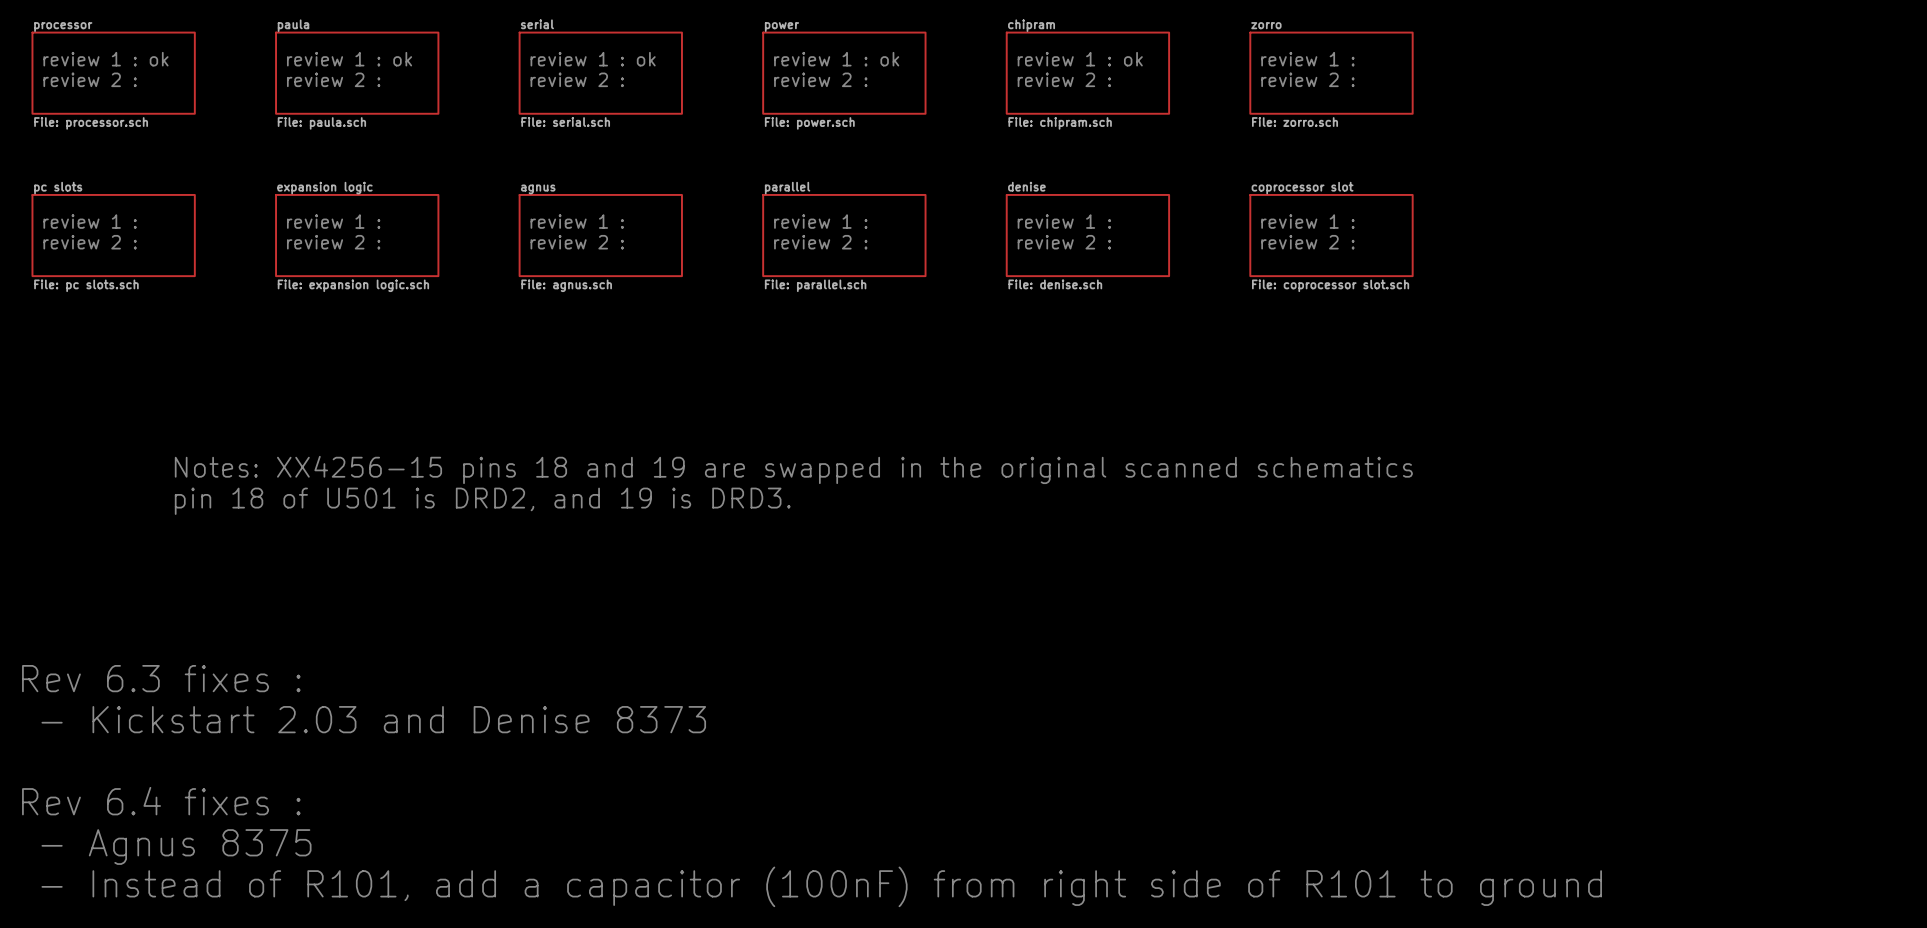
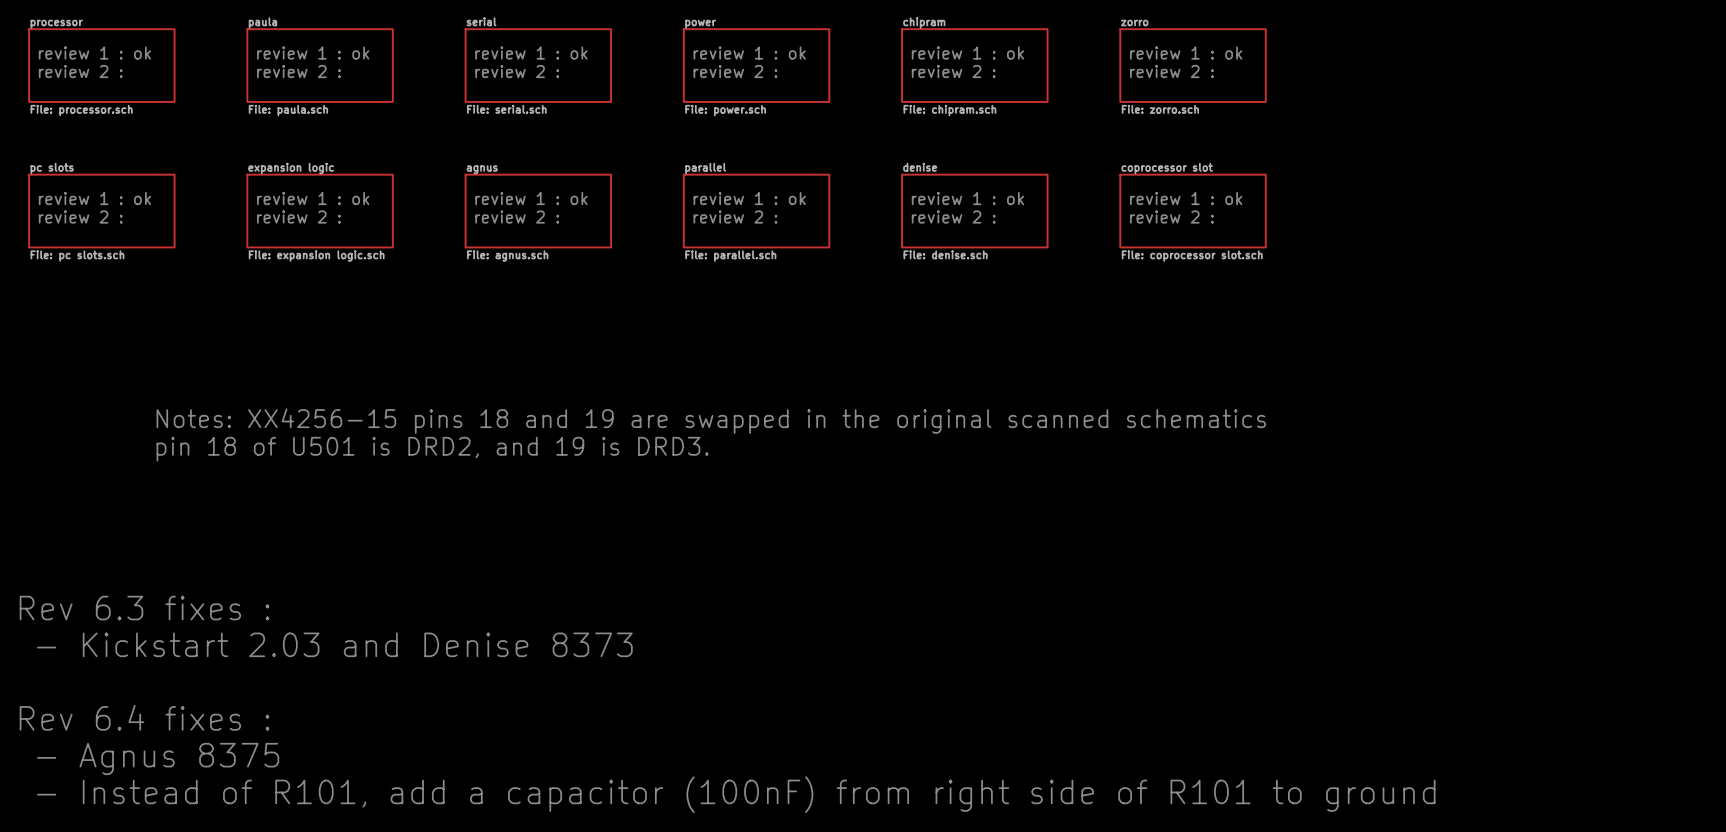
text: review 1 : (1307, 59) -> review 1 : ok (1186, 53)
text: review 1 : (90, 221) -> review 1 : ok (94, 198)
text: review 1 : (333, 221) -> review 1 : ok (313, 198)
text: review 1 : (577, 221) -> review 1 : ok (531, 198)
text: review 1 : (820, 221) -> review 1 : ok (749, 198)
text: review 1 : (1064, 221) -> review 1 : ok (967, 198)
text: review 1 : (1307, 221) -> review 1 : ok (1186, 198)

